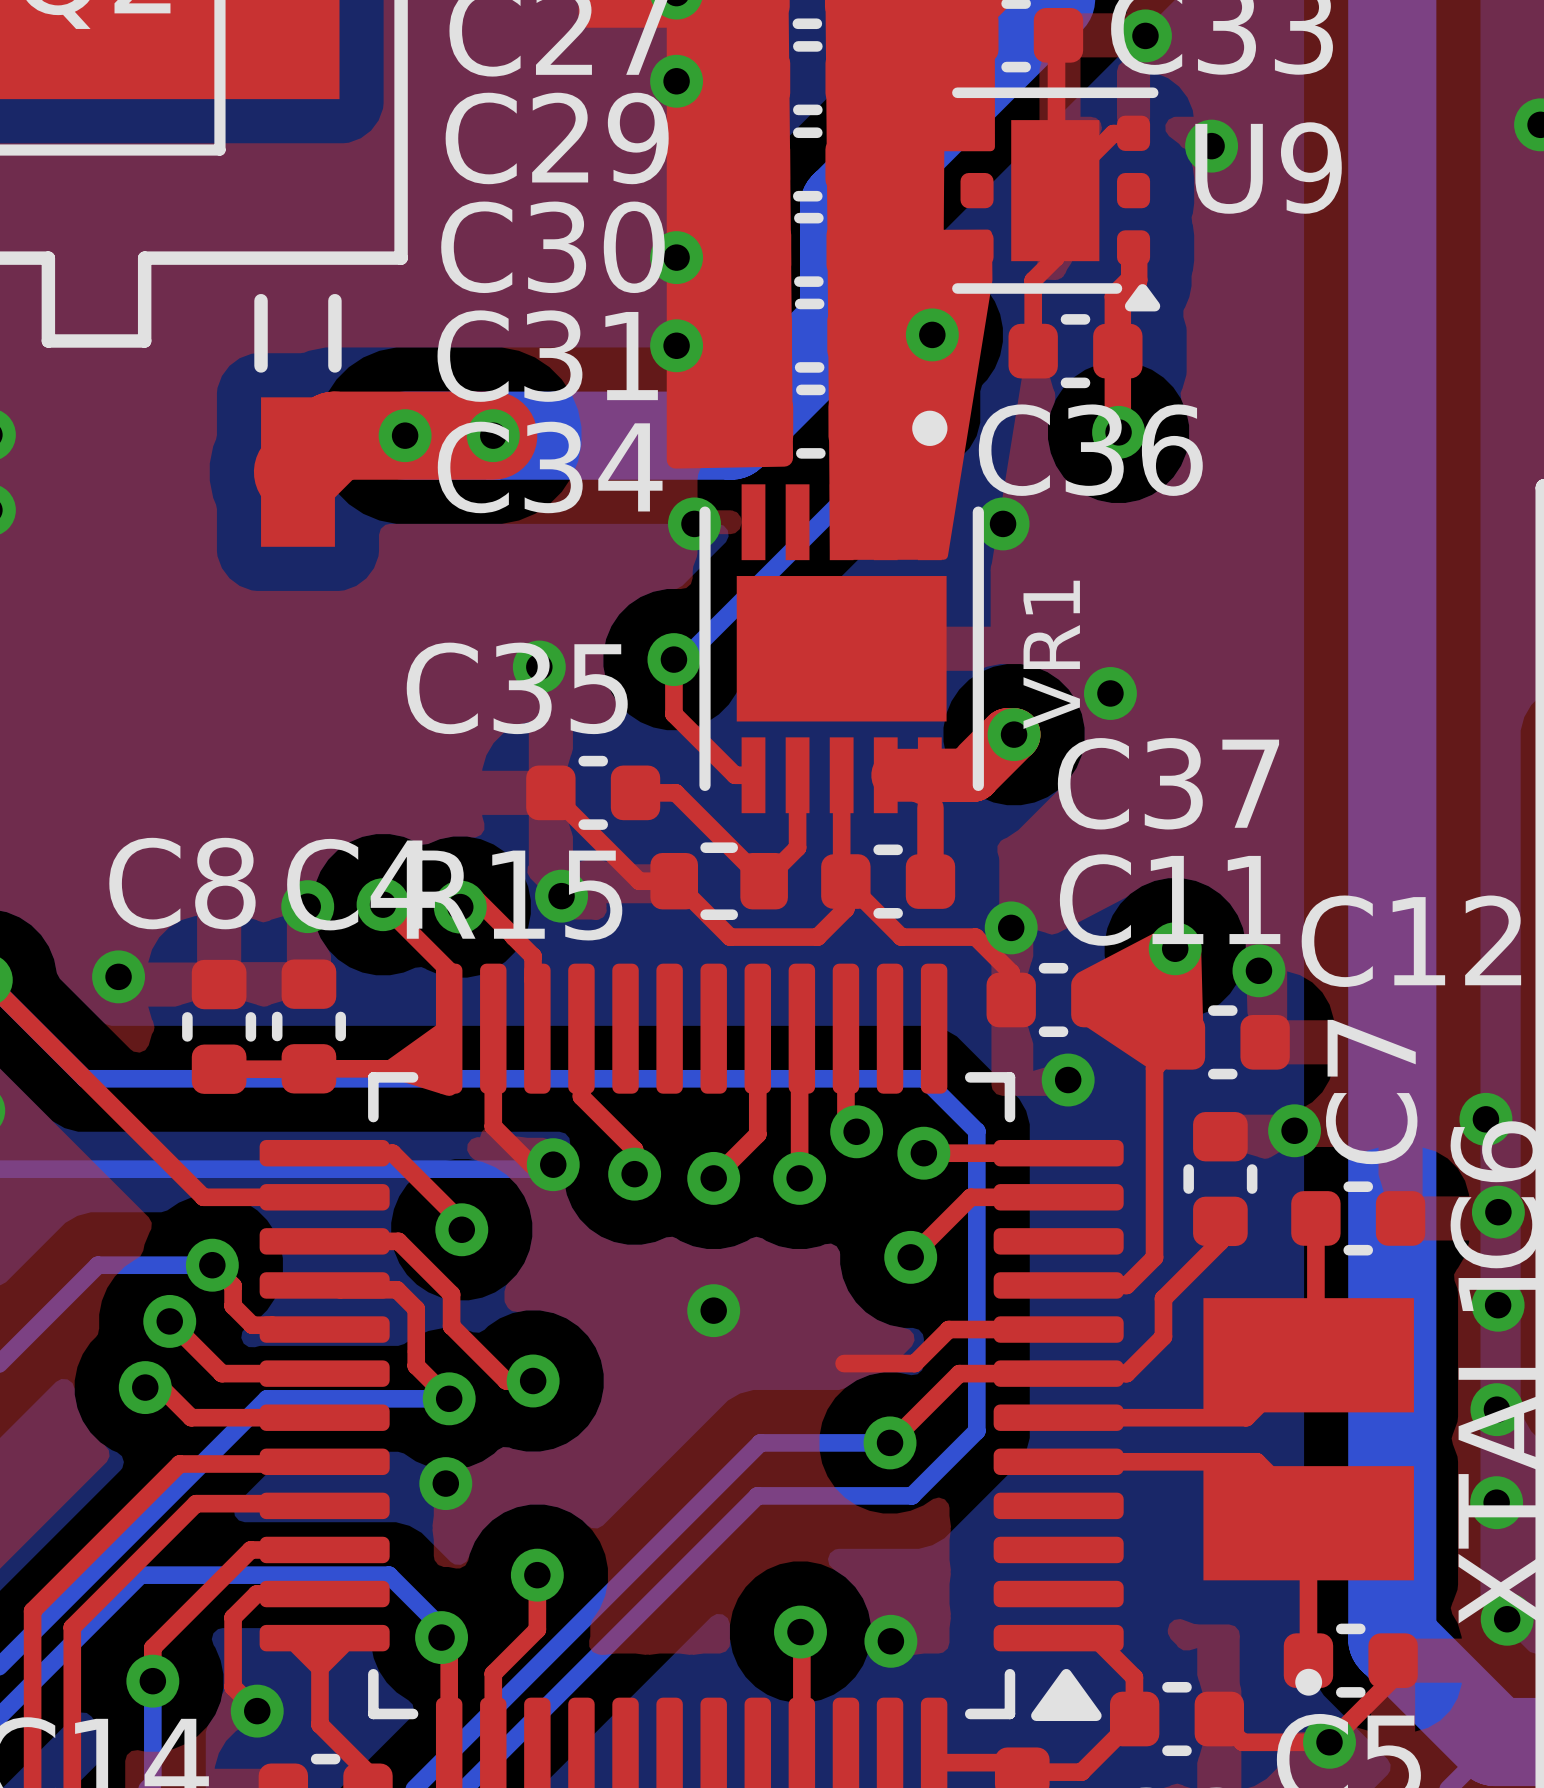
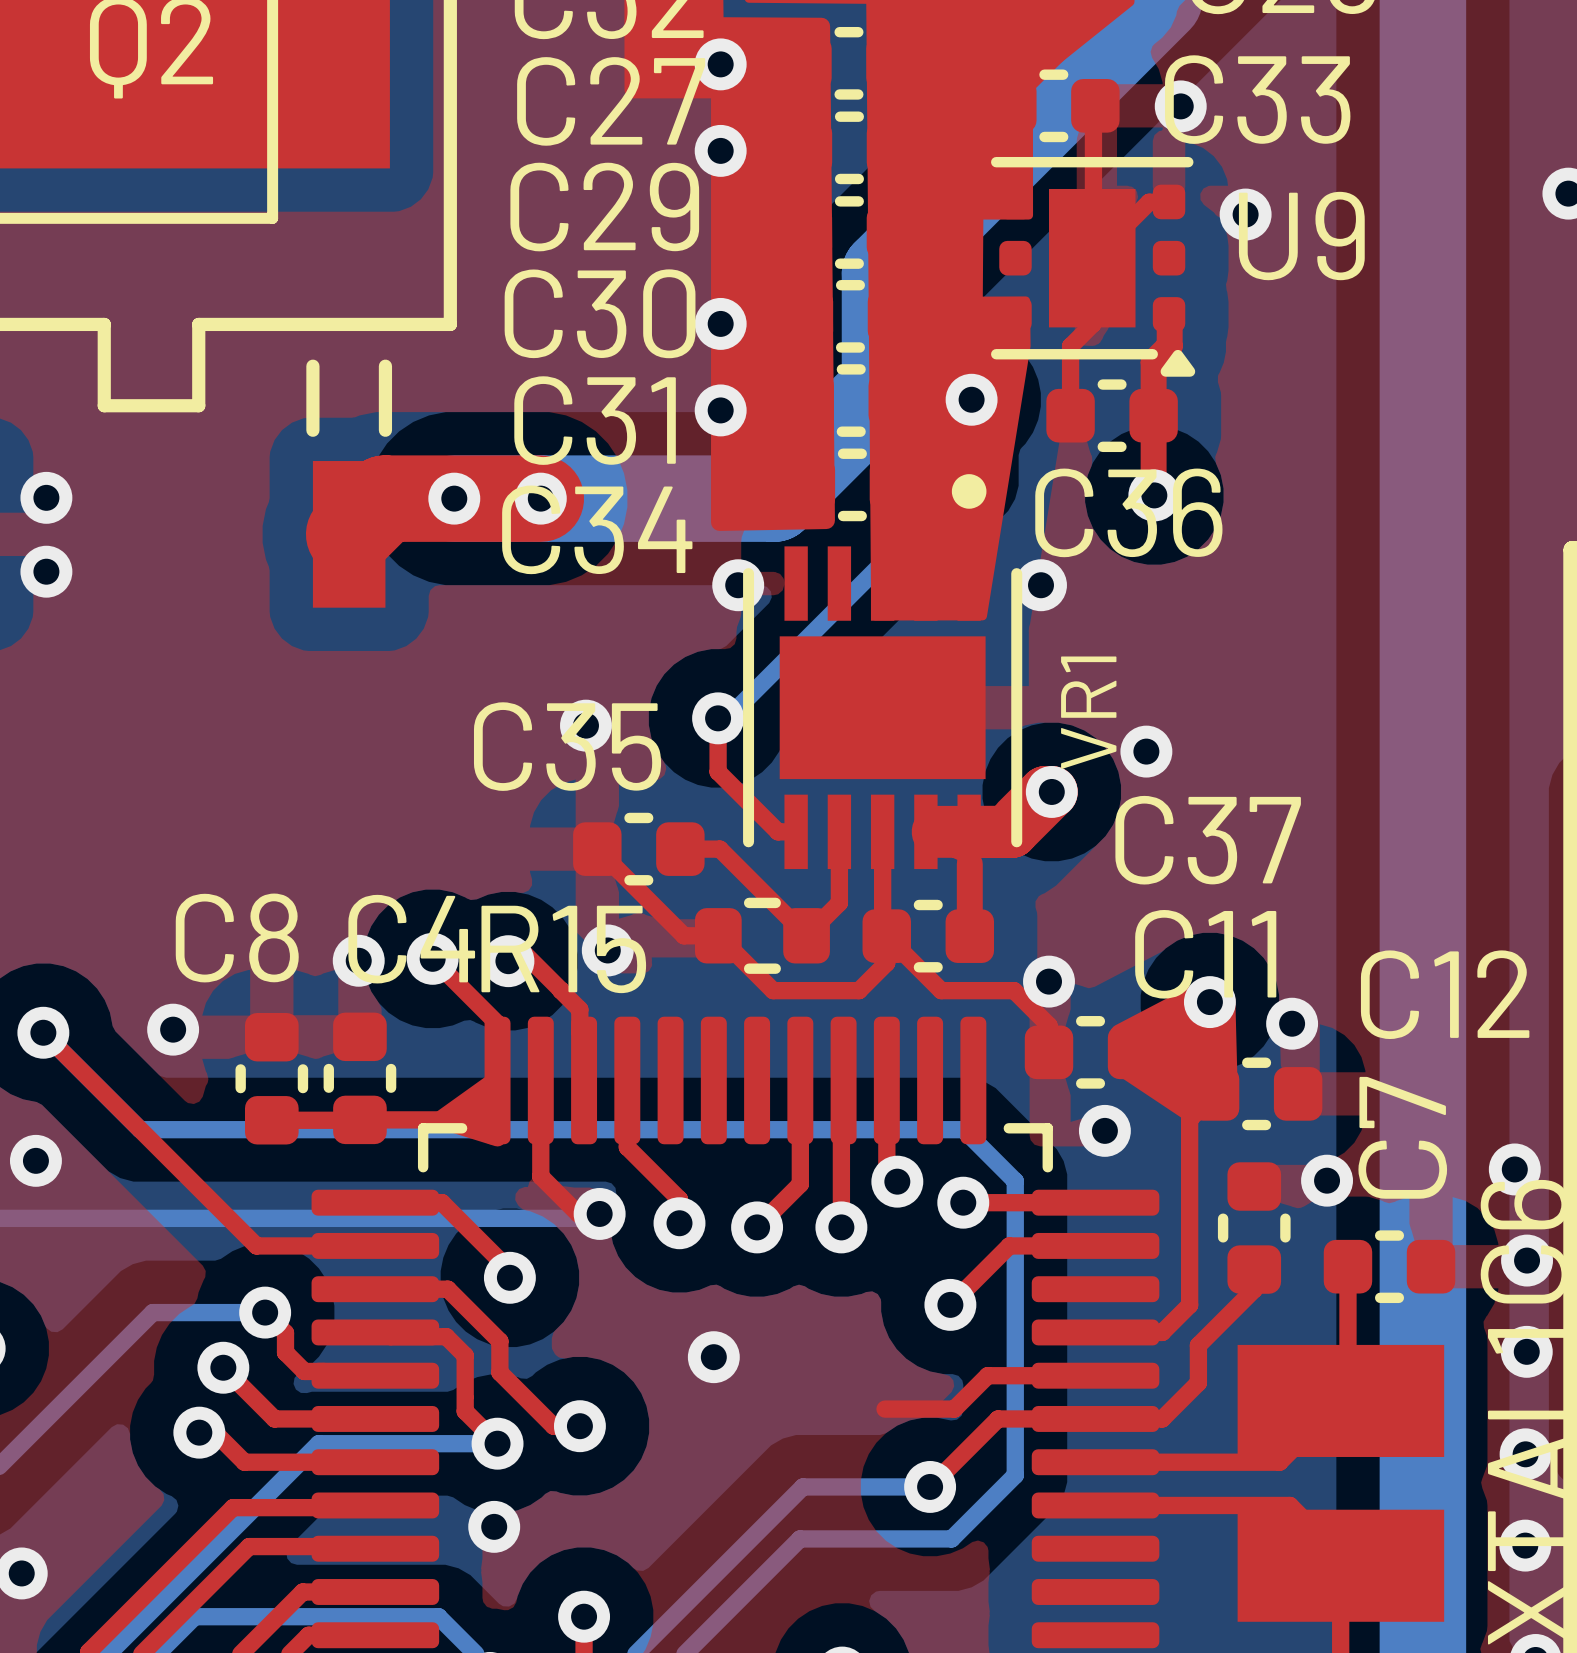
via position: (713, 1310) -> (713, 1357)

